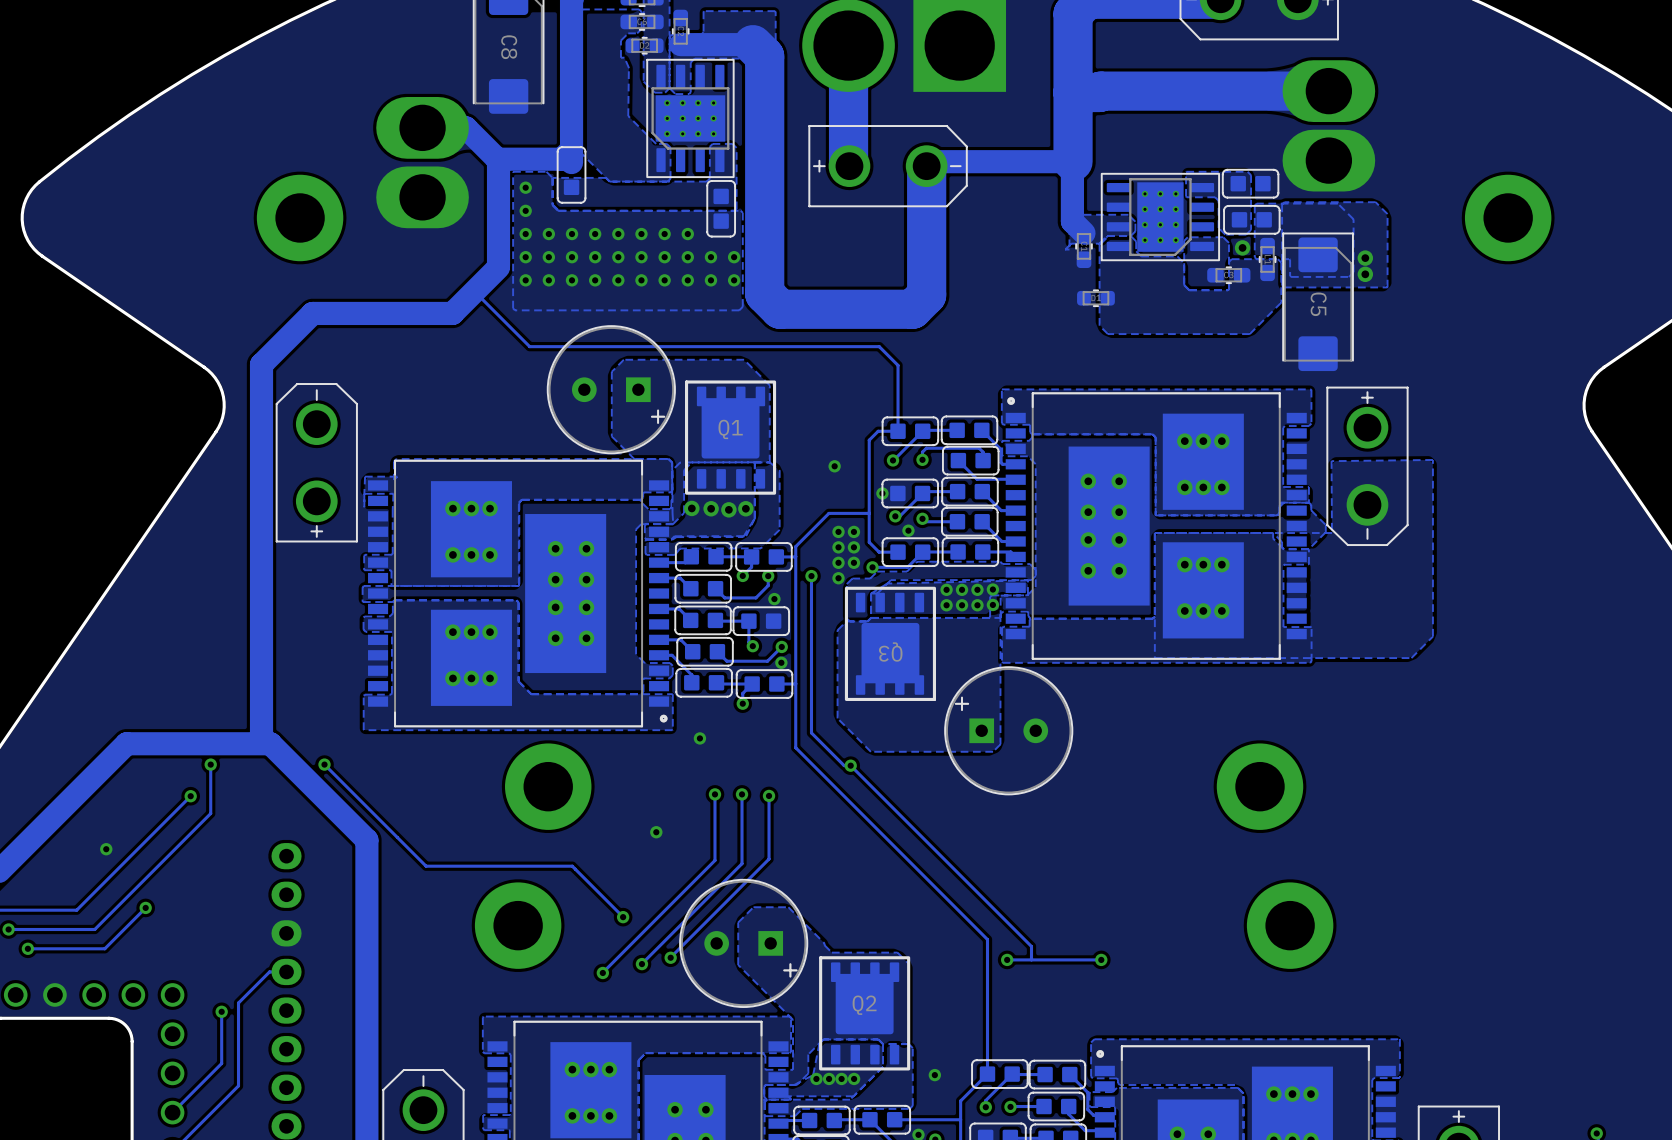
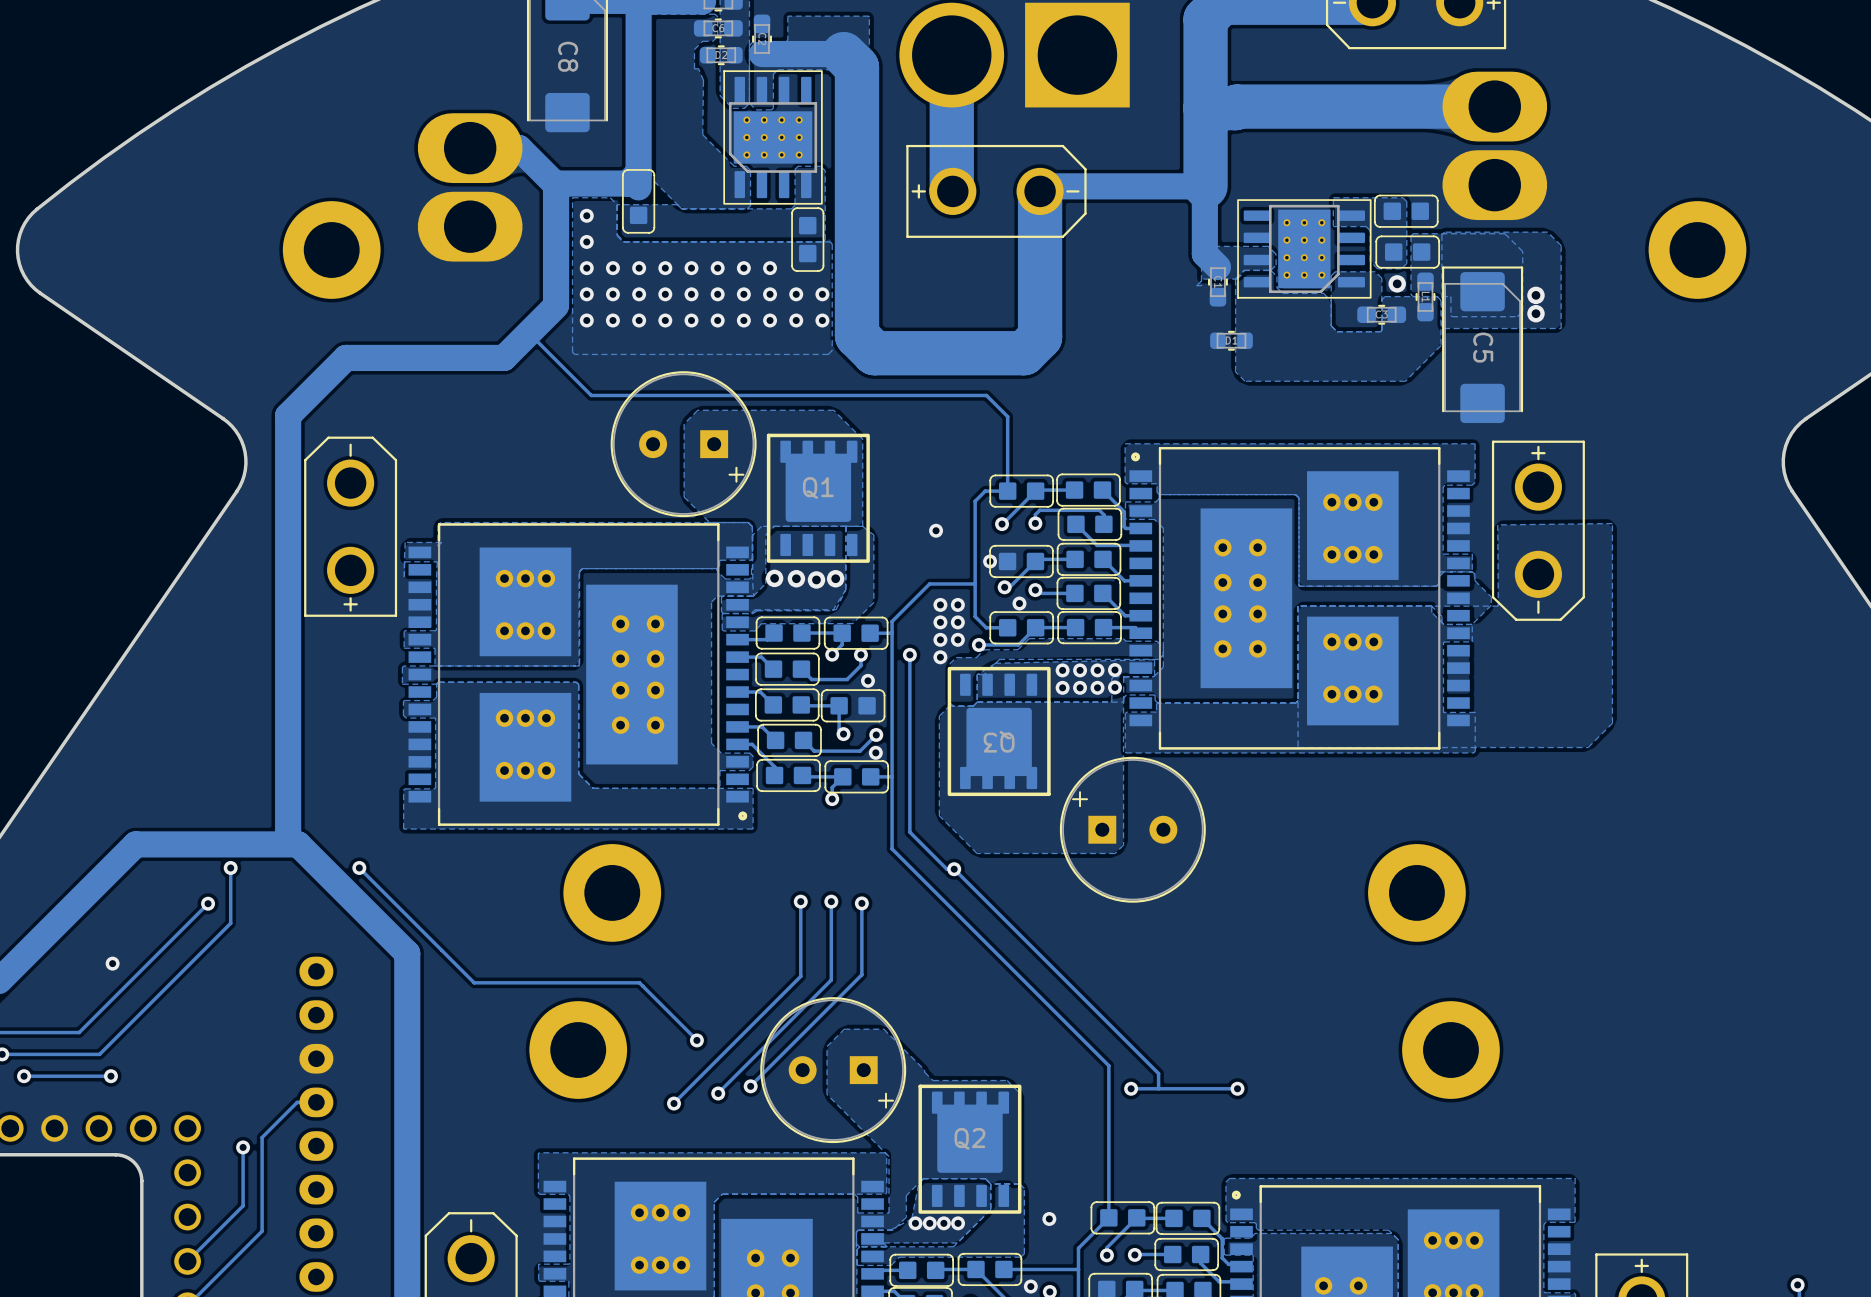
via: (699, 738) -> none
via: (656, 832) -> none
track: (145, 907) (104, 948) -> none
via position: (145, 907) -> (110, 1076)

